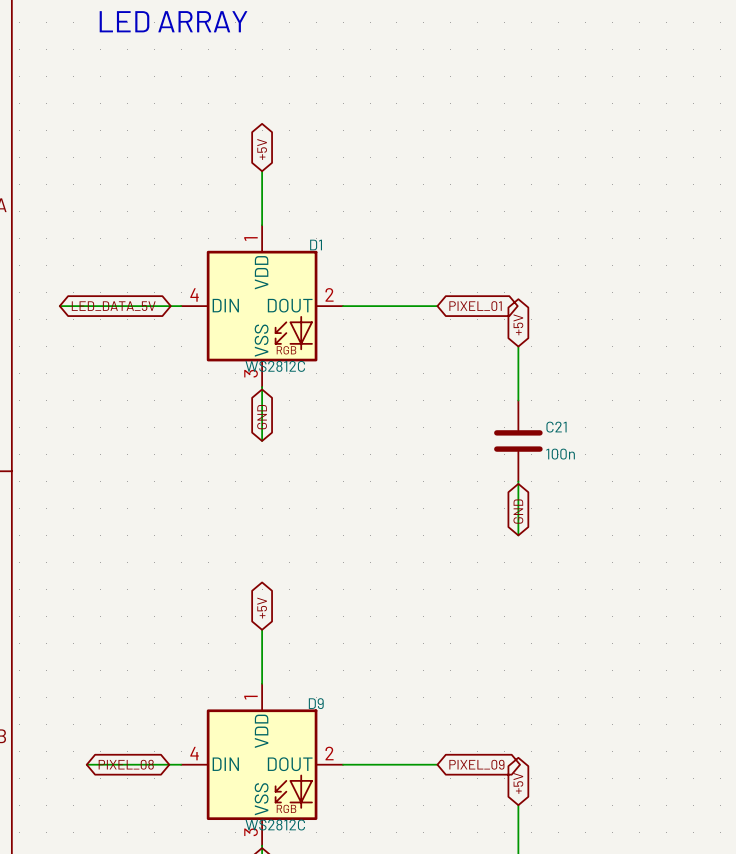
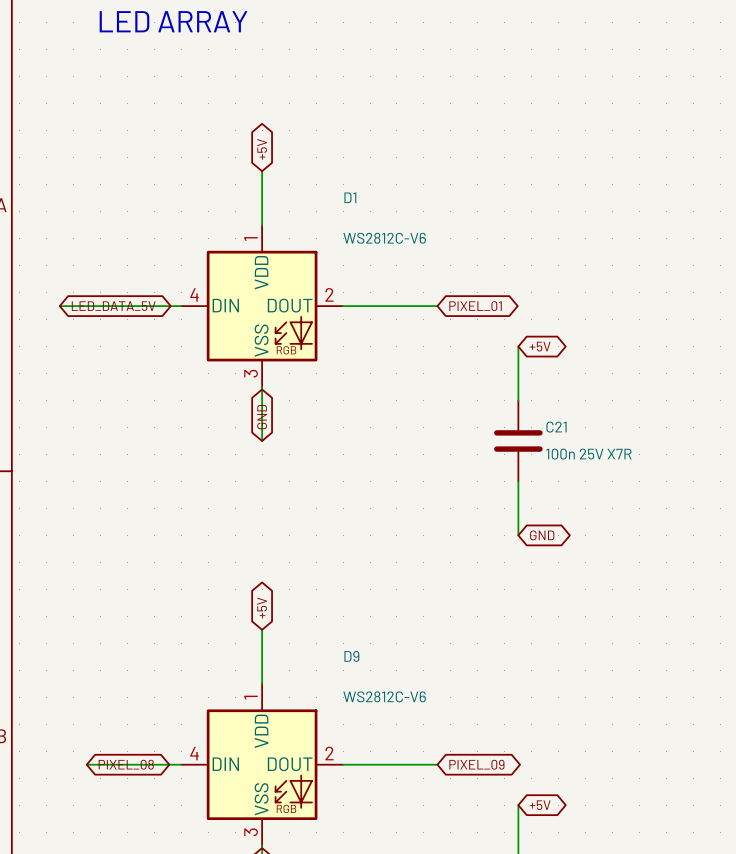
D1 name position: D1 (316, 245) -> D1 (350, 197)
global label rotation: 0° (518, 324) -> 90° clockwise (540, 346)
D1 value: WS2812C (275, 366) -> WS2812C-V6 (384, 238)
C21 value: 100n (560, 454) -> 100n 25V X7R (588, 454)
global label rotation: 0° (518, 511) -> 90° clockwise (542, 535)
D9 name position: D9 (316, 703) -> D9 (351, 656)
global label rotation: 0° (518, 783) -> 90° clockwise (540, 805)
D9 value: WS2812C (275, 825) -> WS2812C-V6 (384, 696)

